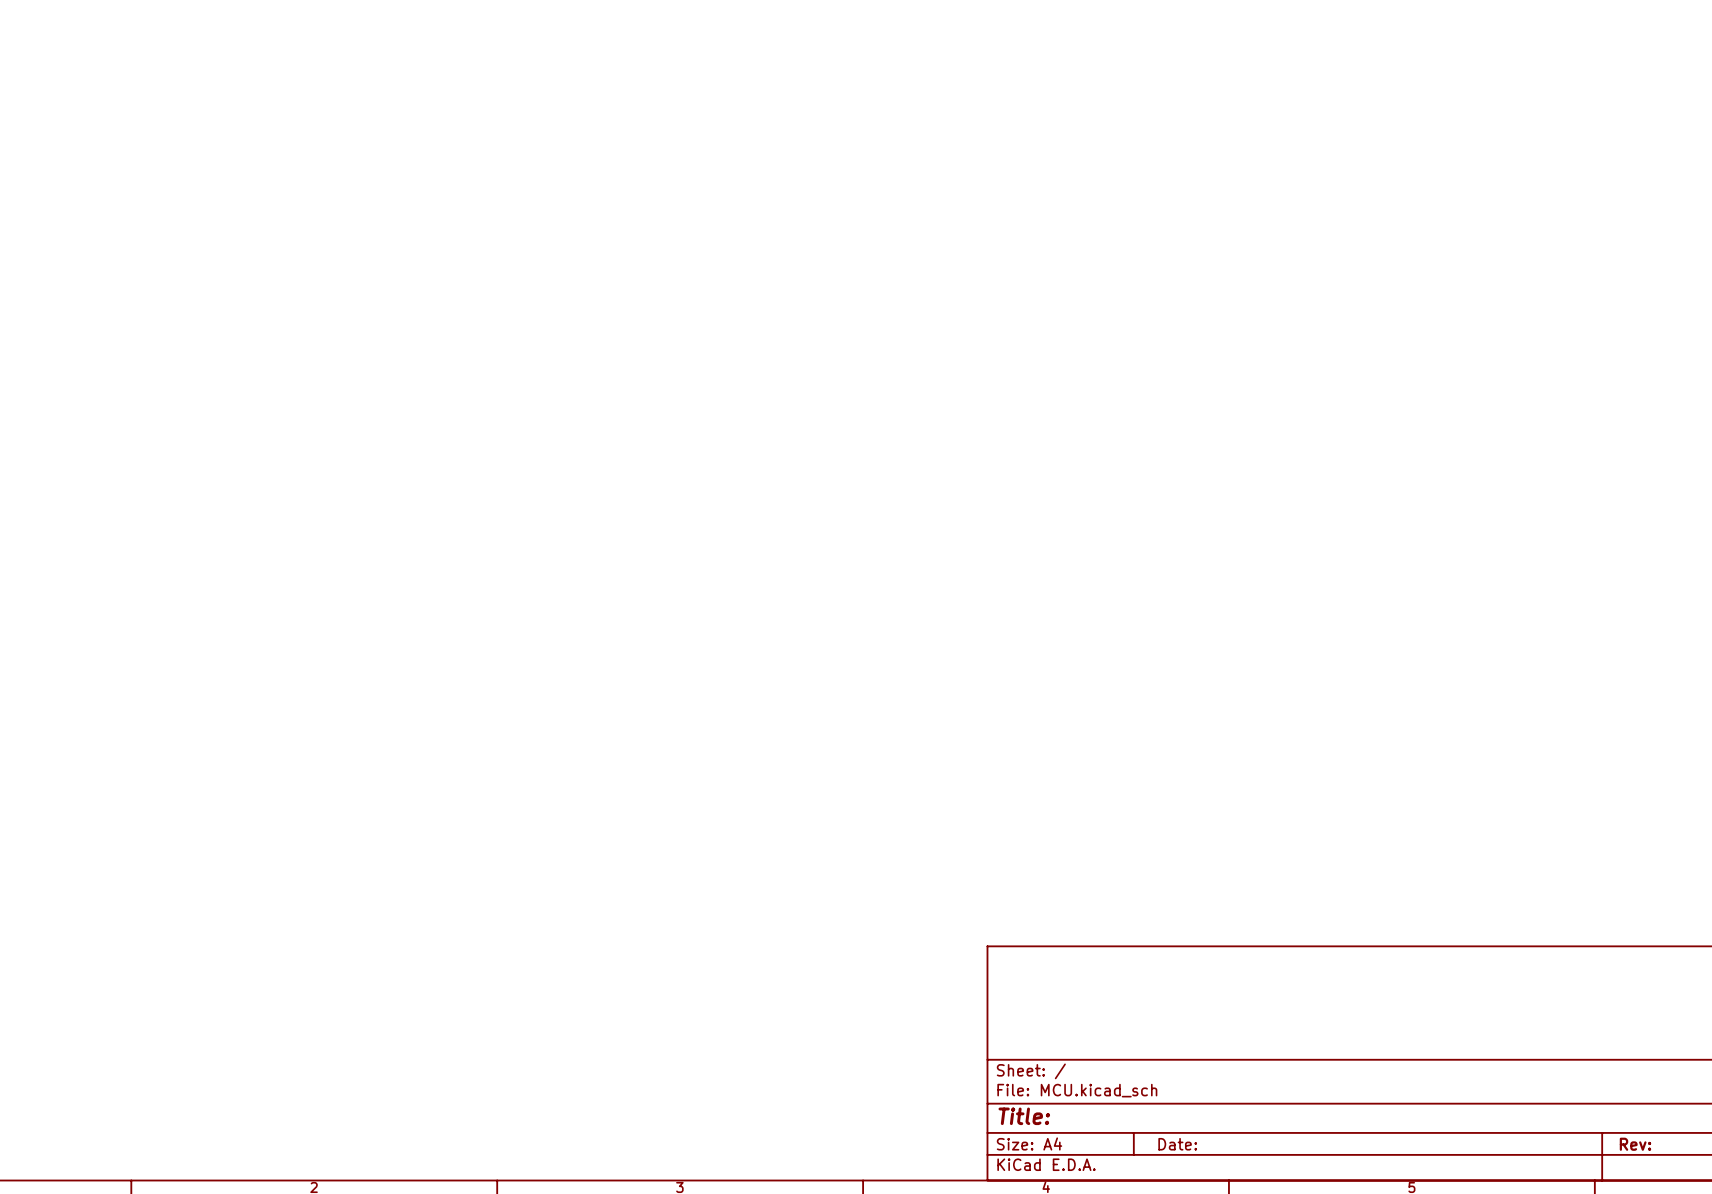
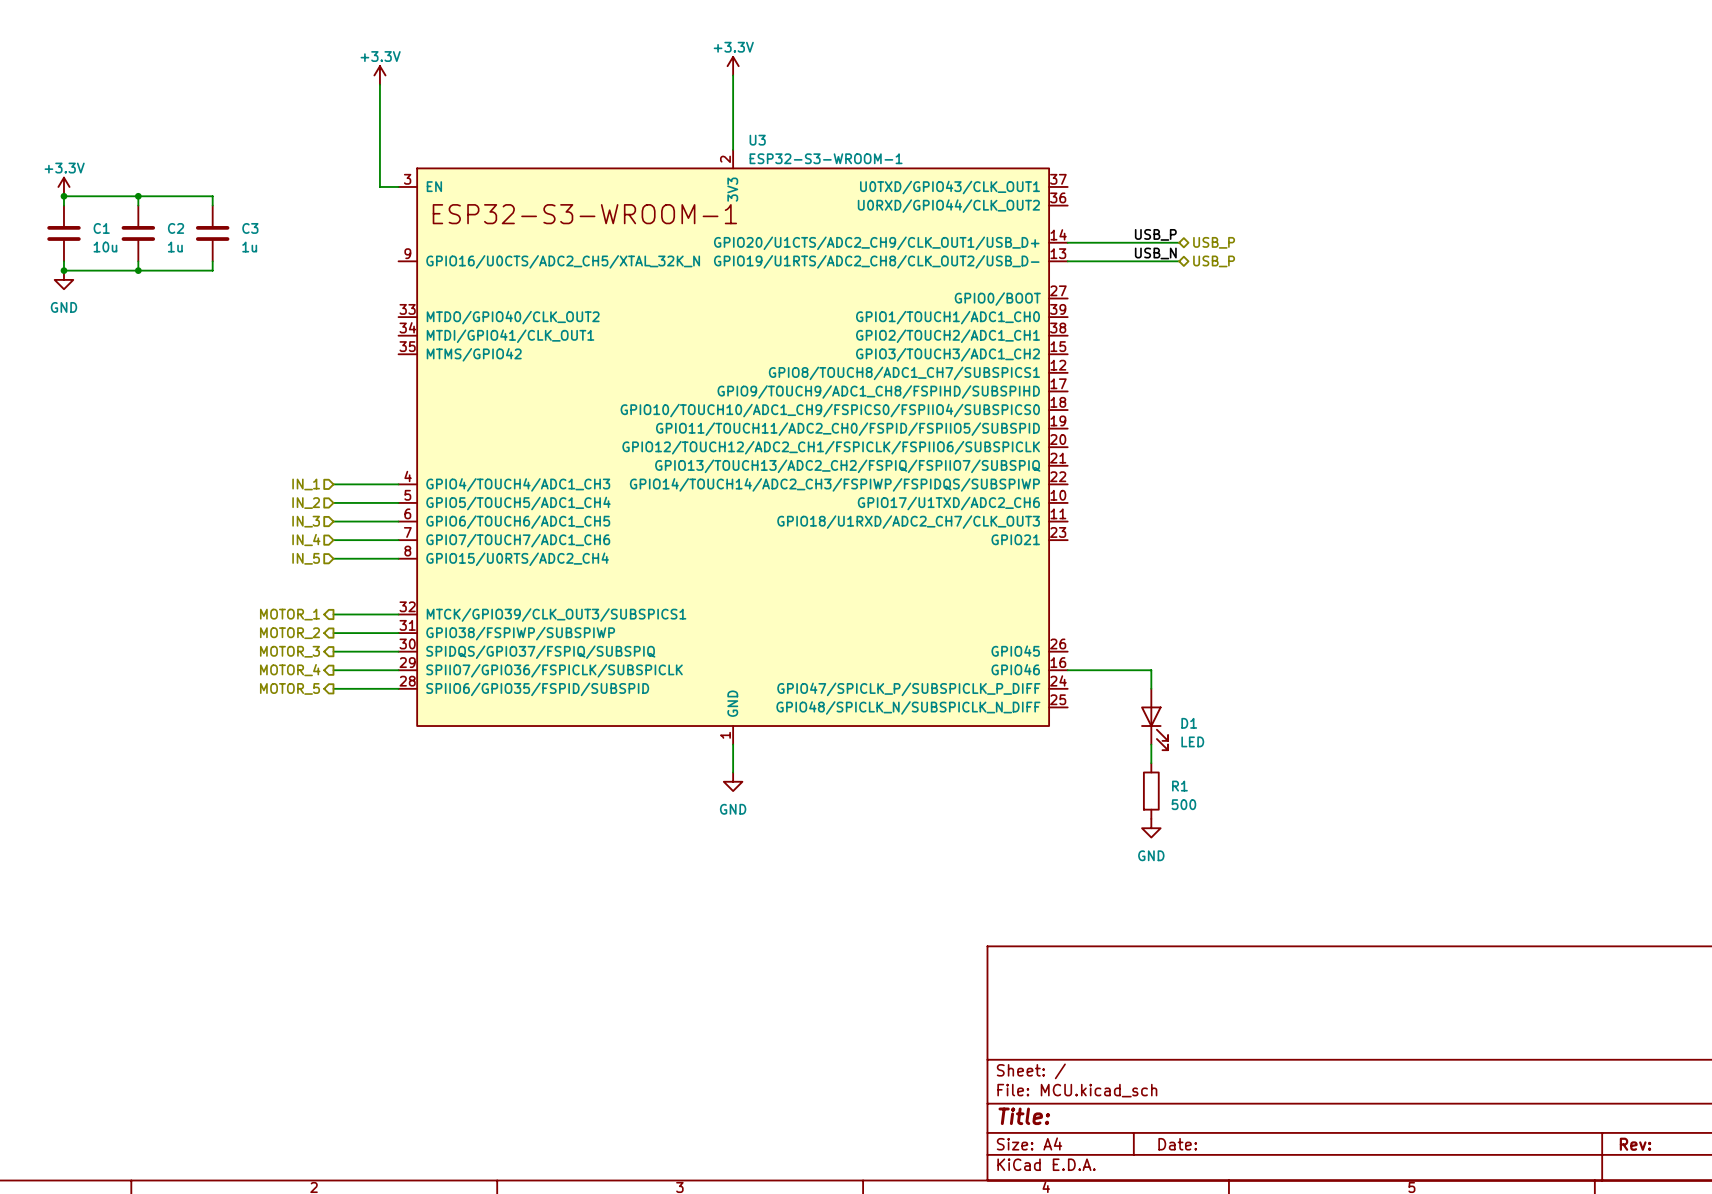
power symbol: none -> +3.3V (733, 66)
power symbol: none -> +3.3V (379, 75)
wire: none -> (733, 75) (733, 149)
wire: none -> (379, 84) (379, 186) (398, 186)
power symbol: none -> +3.3V (63, 186)
junction: none -> (63, 196)
wire: none -> (138, 196) (138, 205)
junction: none -> (138, 196)
wire: none -> (63, 205) (63, 196) (212, 196) (212, 205)
C1: none -> 10u (63, 233)
C2: none -> 1u (138, 233)
C3: none -> 1u (212, 233)
label: none -> USB_P (1155, 234)
wire: none -> (1067, 242) (1179, 242)
hierarchical label: none -> USB_P (1214, 242)
label: none -> USB_N (1155, 253)
wire: none -> (63, 261) (63, 270) (212, 270) (212, 261)
wire: none -> (138, 261) (138, 270)
wire: none -> (1067, 261) (1179, 261)
hierarchical label: none -> USB_P (1214, 261)
junction: none -> (63, 270)
junction: none -> (138, 270)
power symbol: none -> GND (63, 279)
U3: none -> ESP32-S3-WROOM-1 (733, 447)
hierarchical label: none -> IN_1 (306, 484)
wire: none -> (333, 484) (398, 484)
wire: none -> (333, 502) (398, 502)
hierarchical label: none -> IN_2 (306, 503)
hierarchical label: none -> IN_3 (306, 521)
wire: none -> (333, 521) (398, 521)
hierarchical label: none -> IN_4 (306, 540)
wire: none -> (333, 540) (398, 540)
hierarchical label: none -> IN_5 (306, 558)
wire: none -> (333, 558) (398, 558)
hierarchical label: none -> MOTOR_1 (289, 614)
wire: none -> (333, 614) (398, 614)
hierarchical label: none -> MOTOR_2 (289, 633)
wire: none -> (333, 633) (398, 633)
hierarchical label: none -> MOTOR_3 (289, 651)
wire: none -> (333, 651) (398, 651)
hierarchical label: none -> MOTOR_4 (290, 670)
wire: none -> (333, 670) (398, 670)
wire: none -> (1067, 670) (1151, 670) (1151, 688)
hierarchical label: none -> MOTOR_5 (289, 688)
wire: none -> (333, 688) (398, 688)
D1: none -> LED (1154, 719)
wire: none -> (733, 744) (733, 772)
wire: none -> (1151, 744) (1151, 763)
power symbol: none -> GND (733, 781)
R1: none -> 500 (1151, 791)
power symbol: none -> GND (1151, 828)

